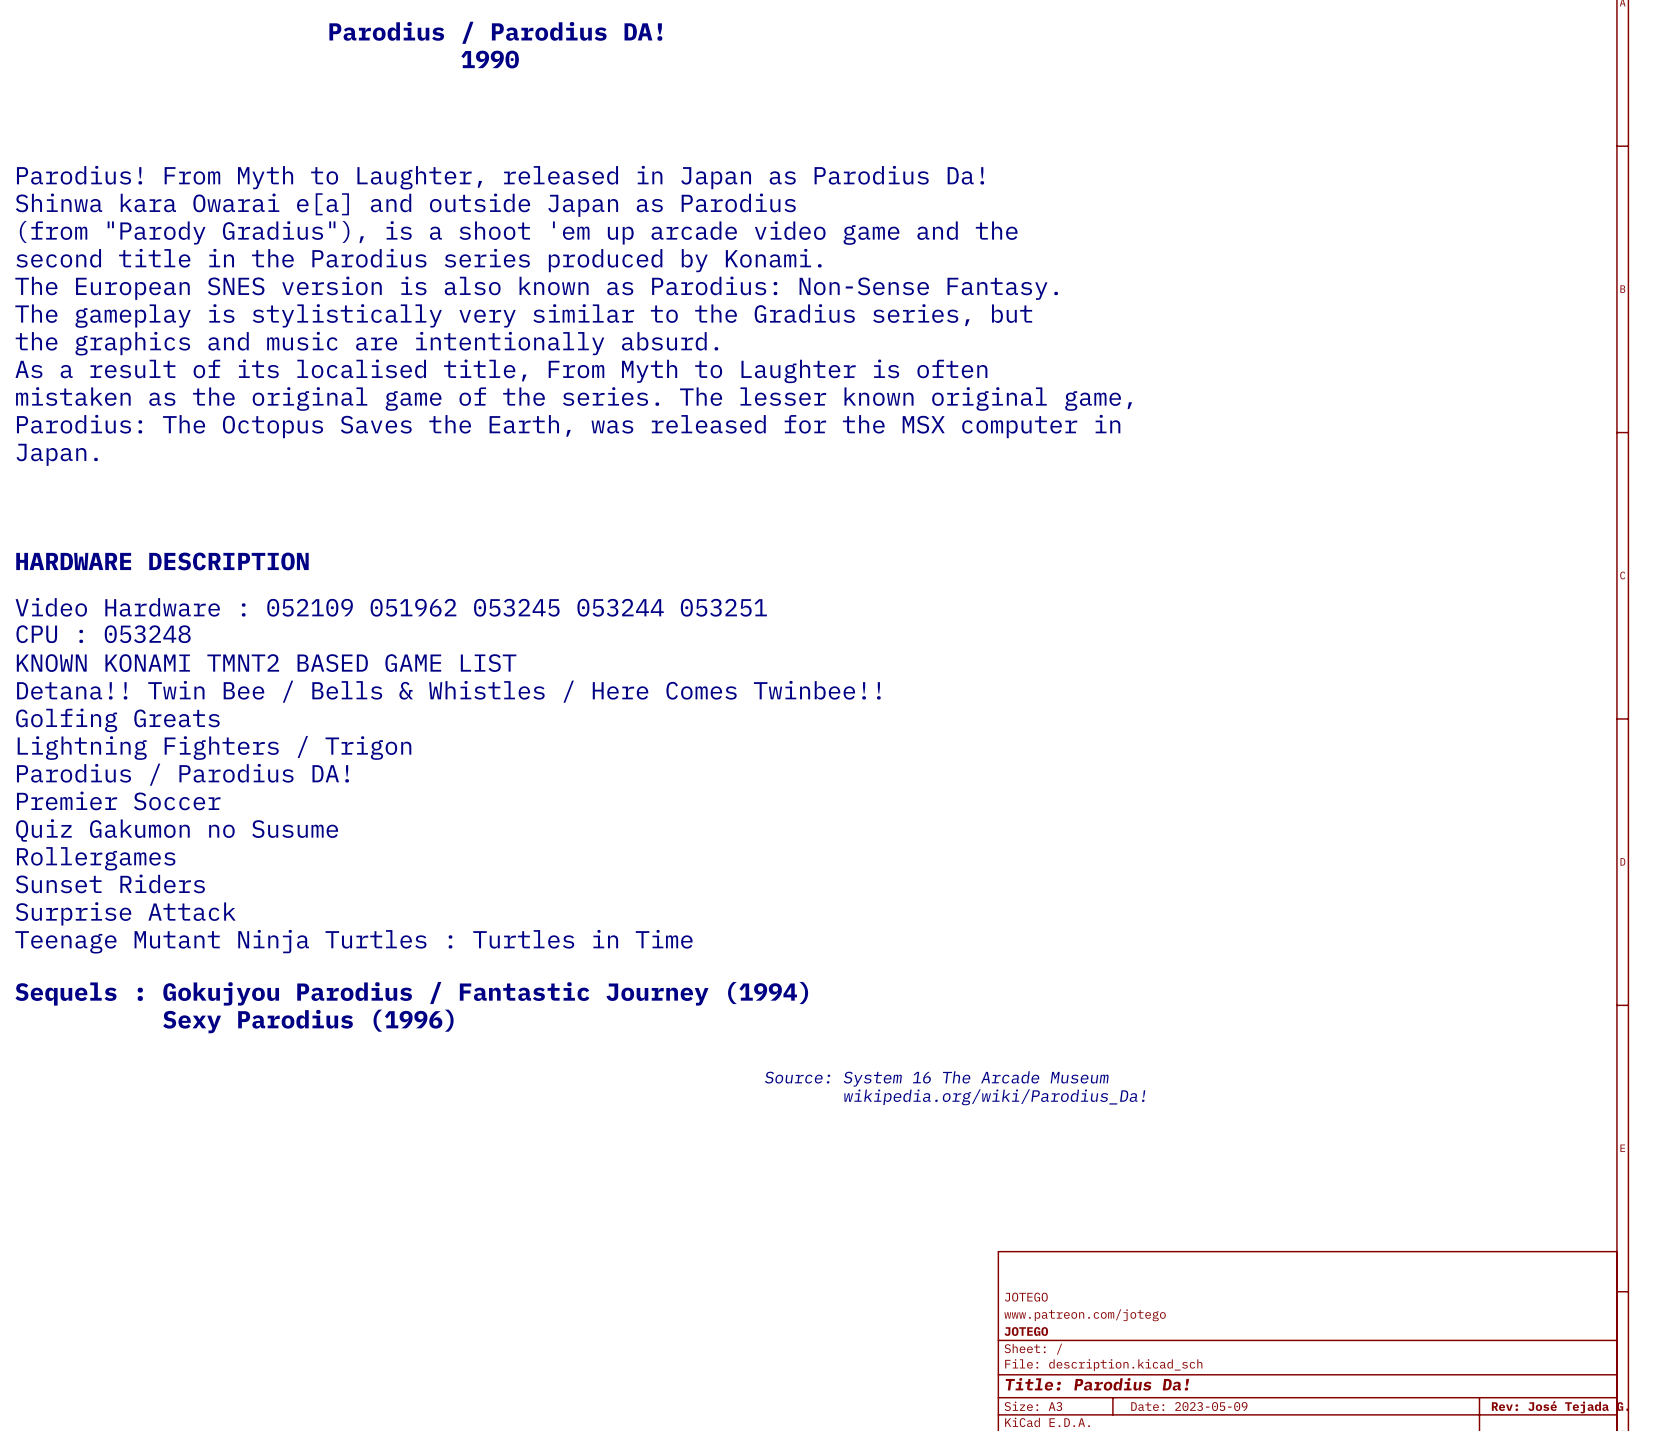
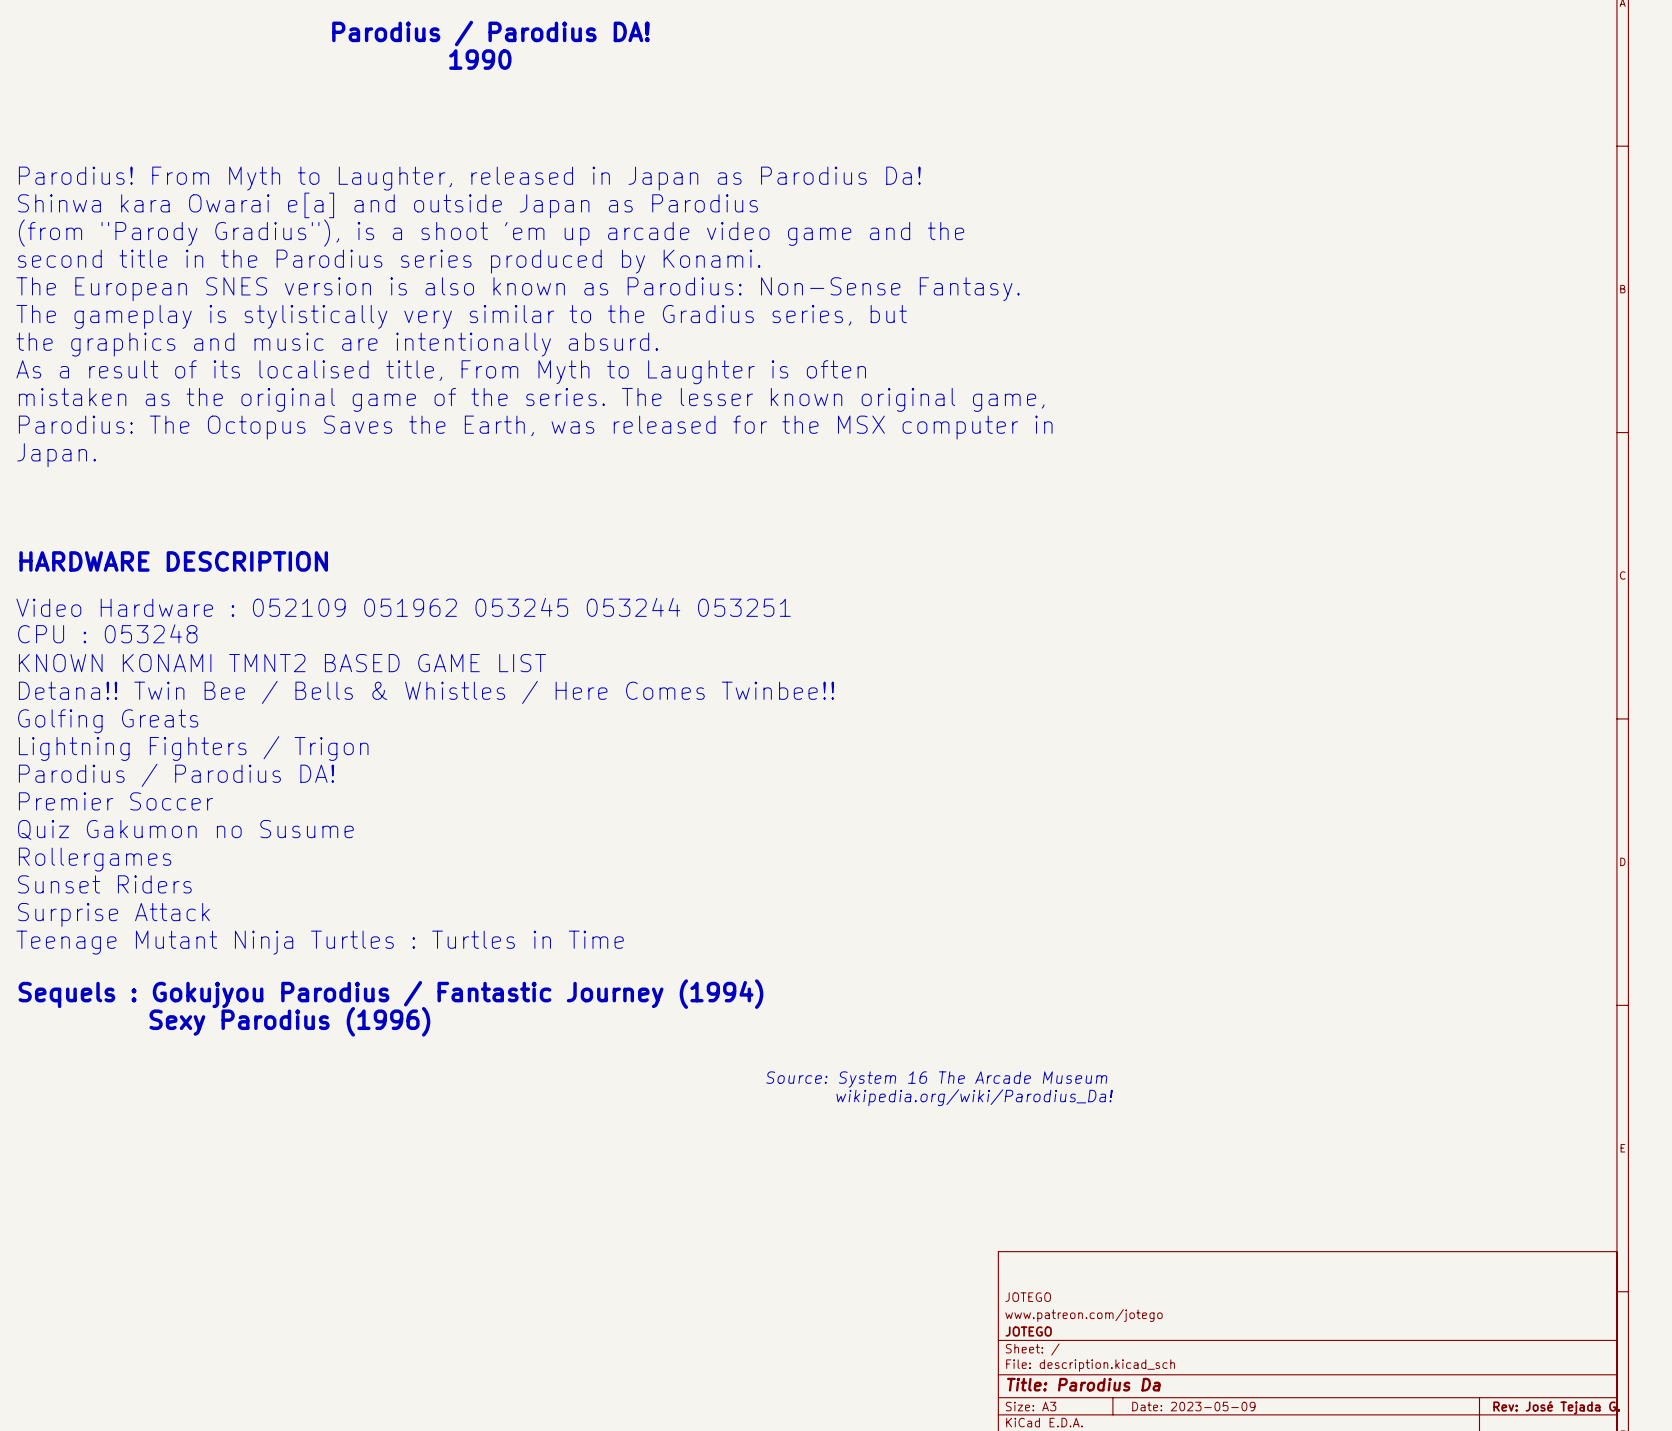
title block: Title: Parodius Da! (1097, 1384) -> Title: Parodius Da (1083, 1384)

